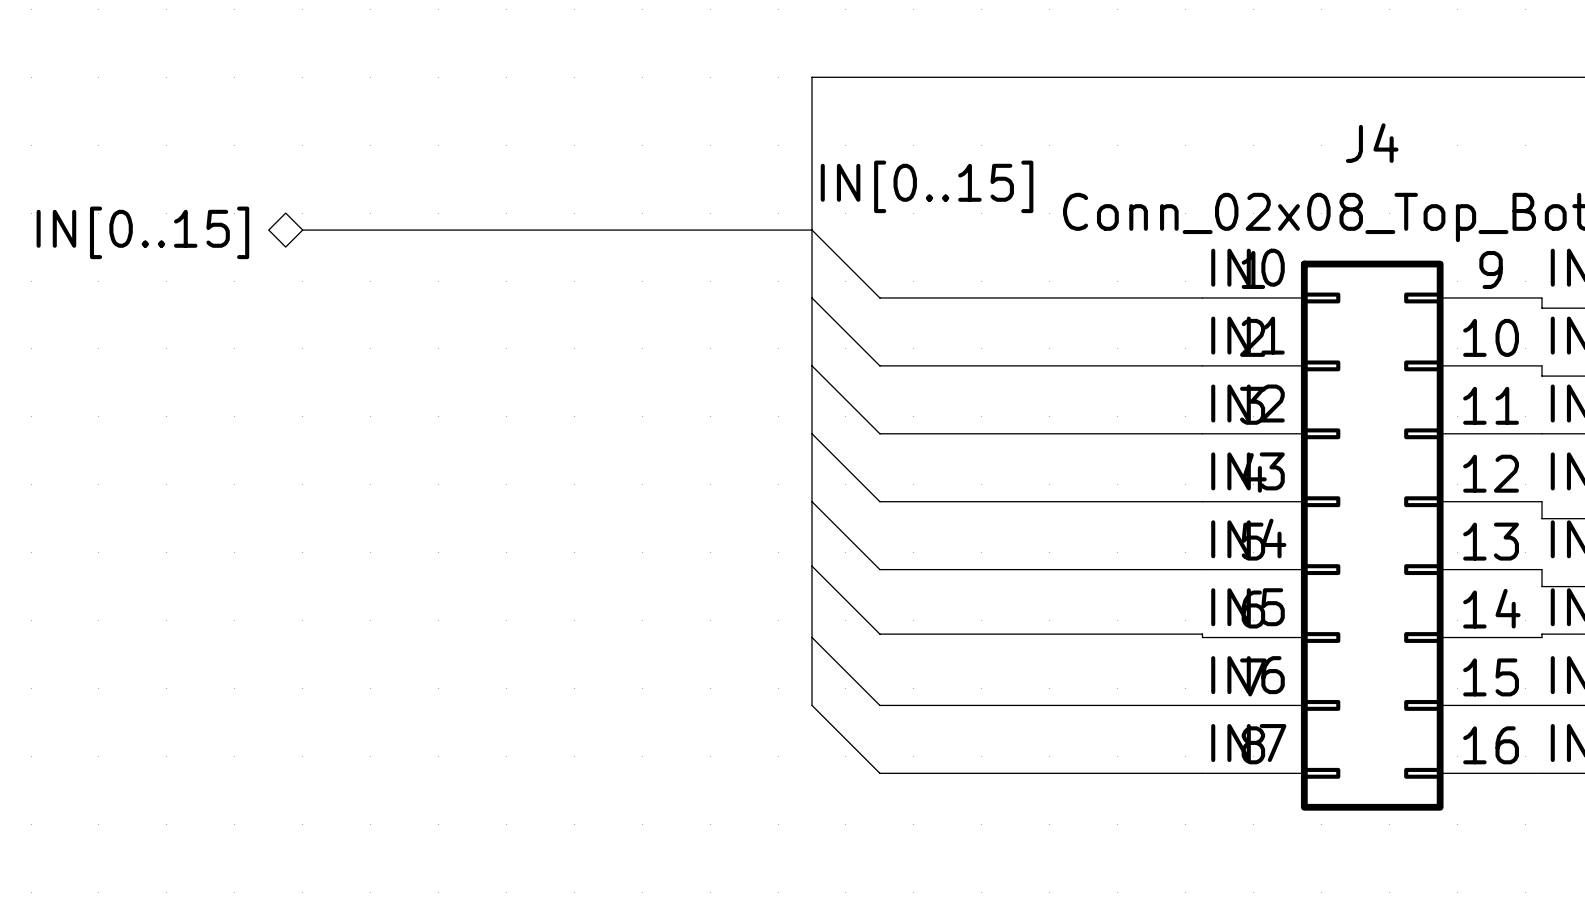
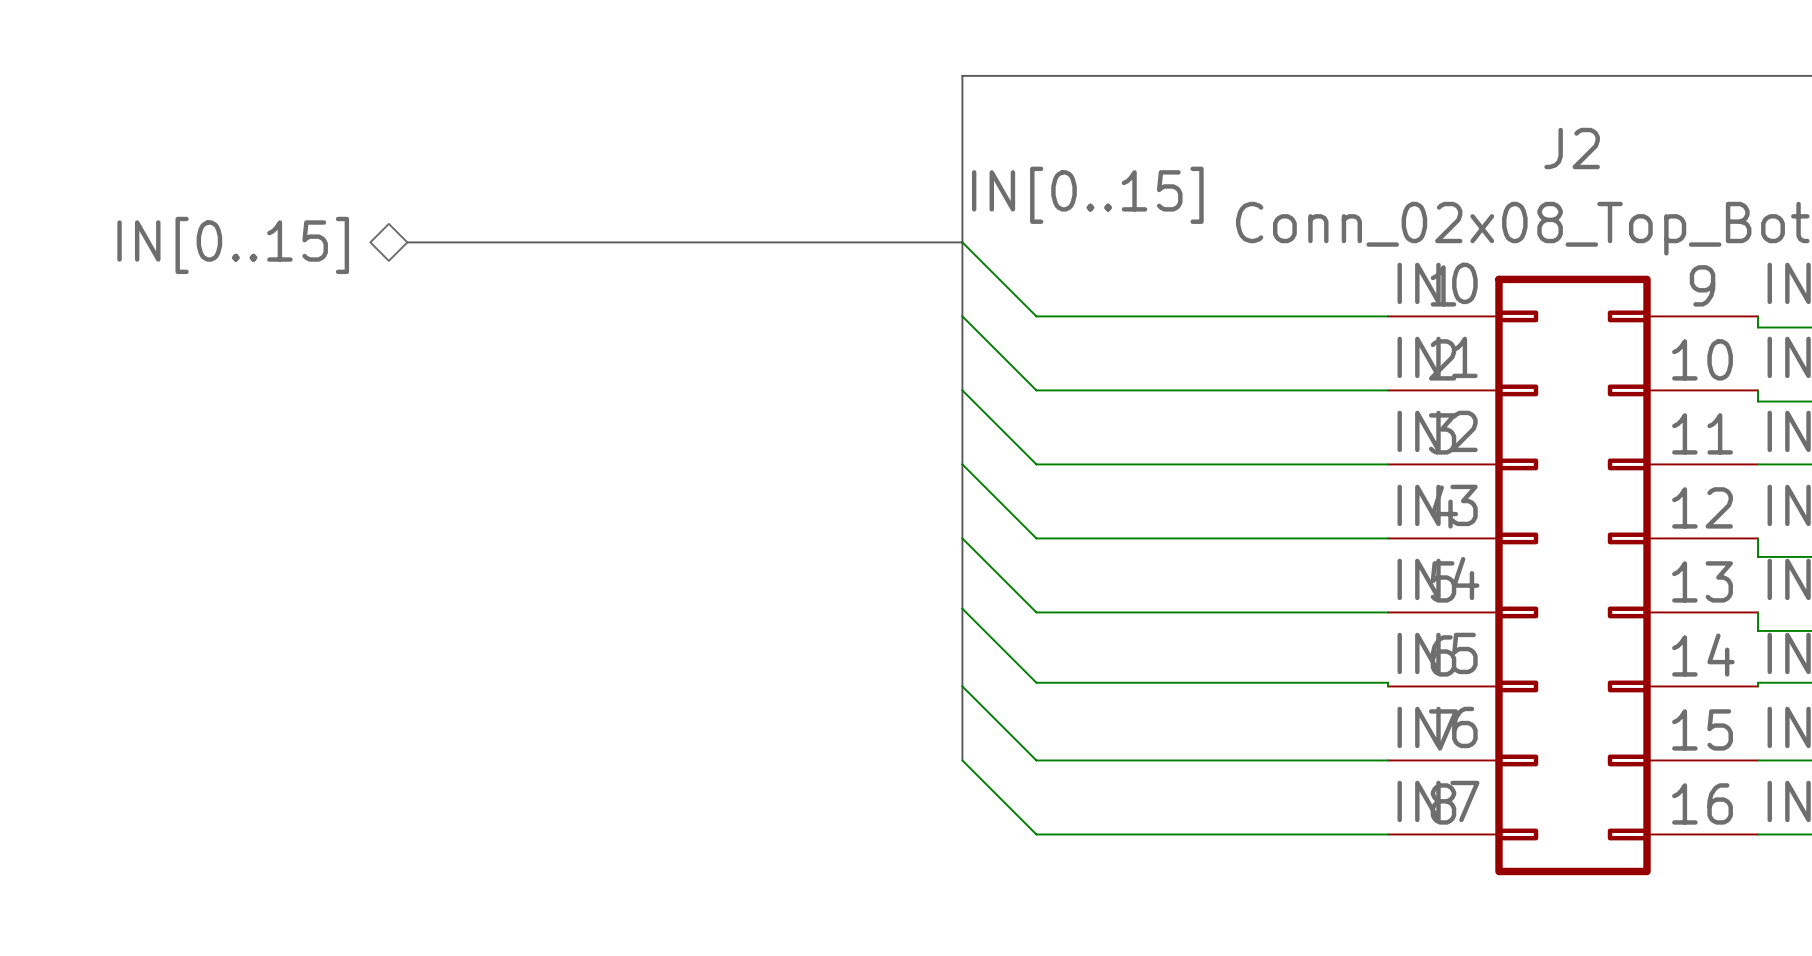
J4 name: J4 (1372, 143) -> J2 (1572, 148)

